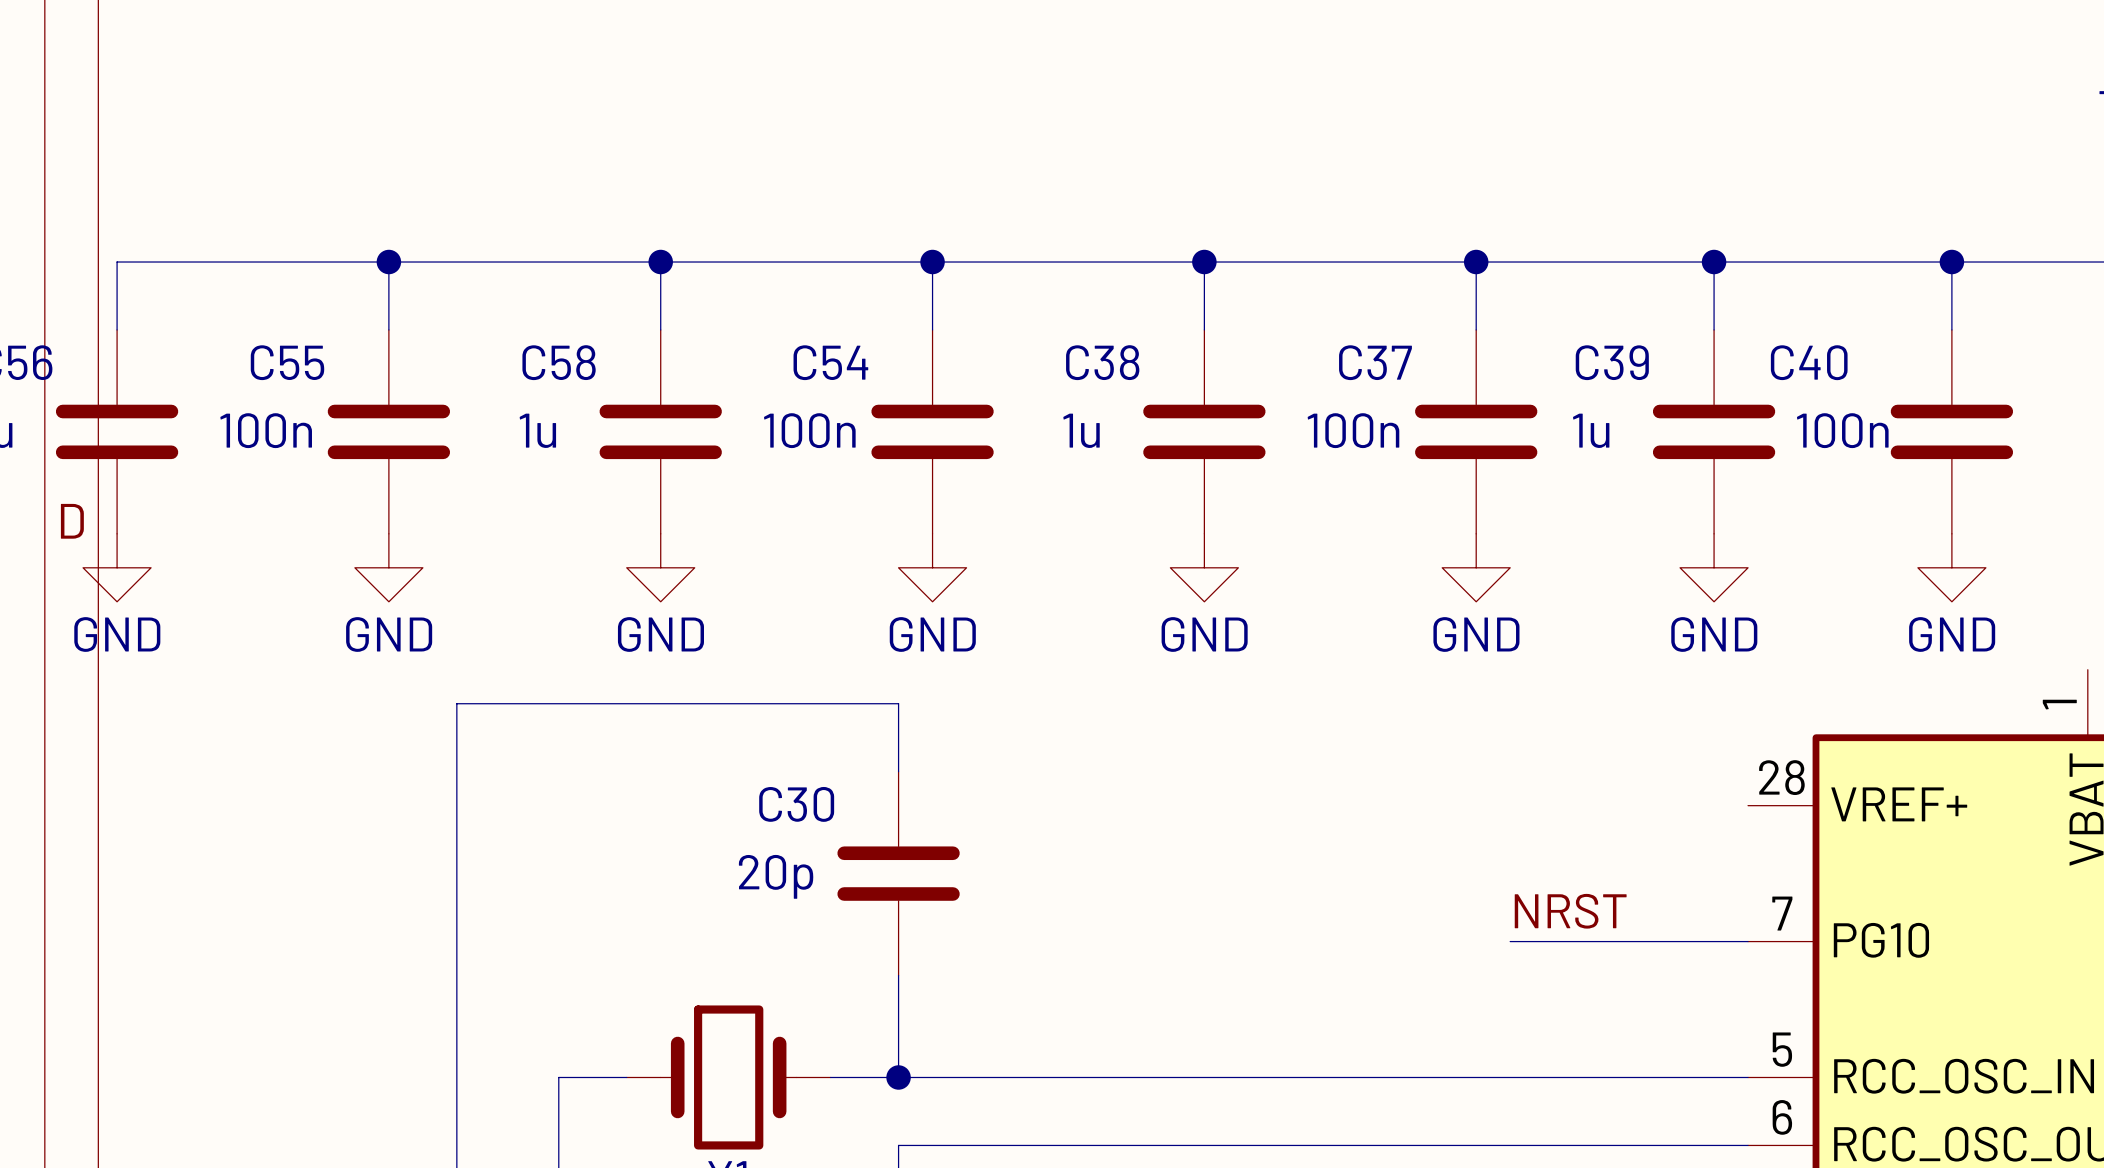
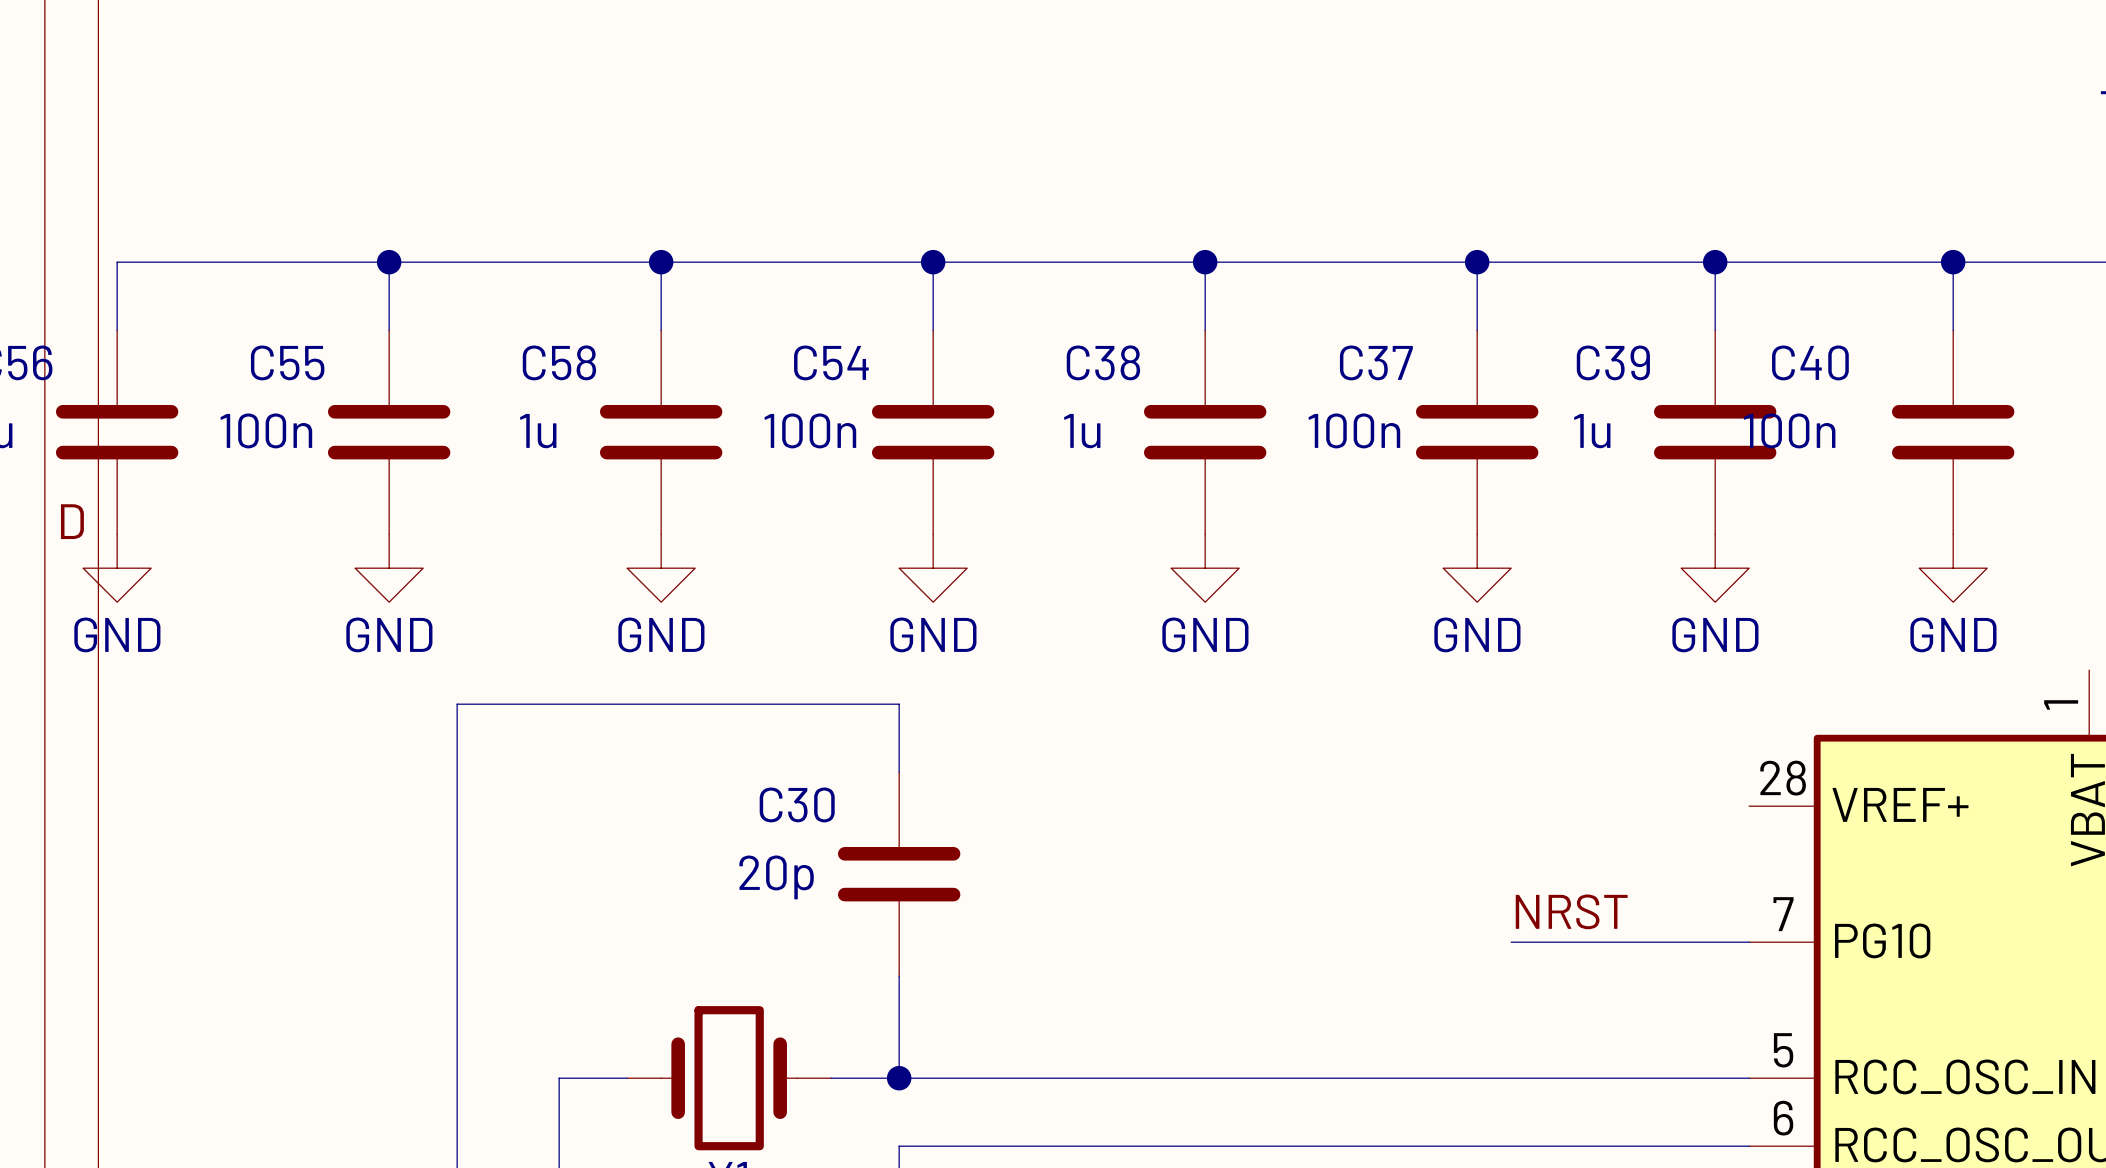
C40 value position: 100n (1842, 430) -> 100n (1789, 430)

